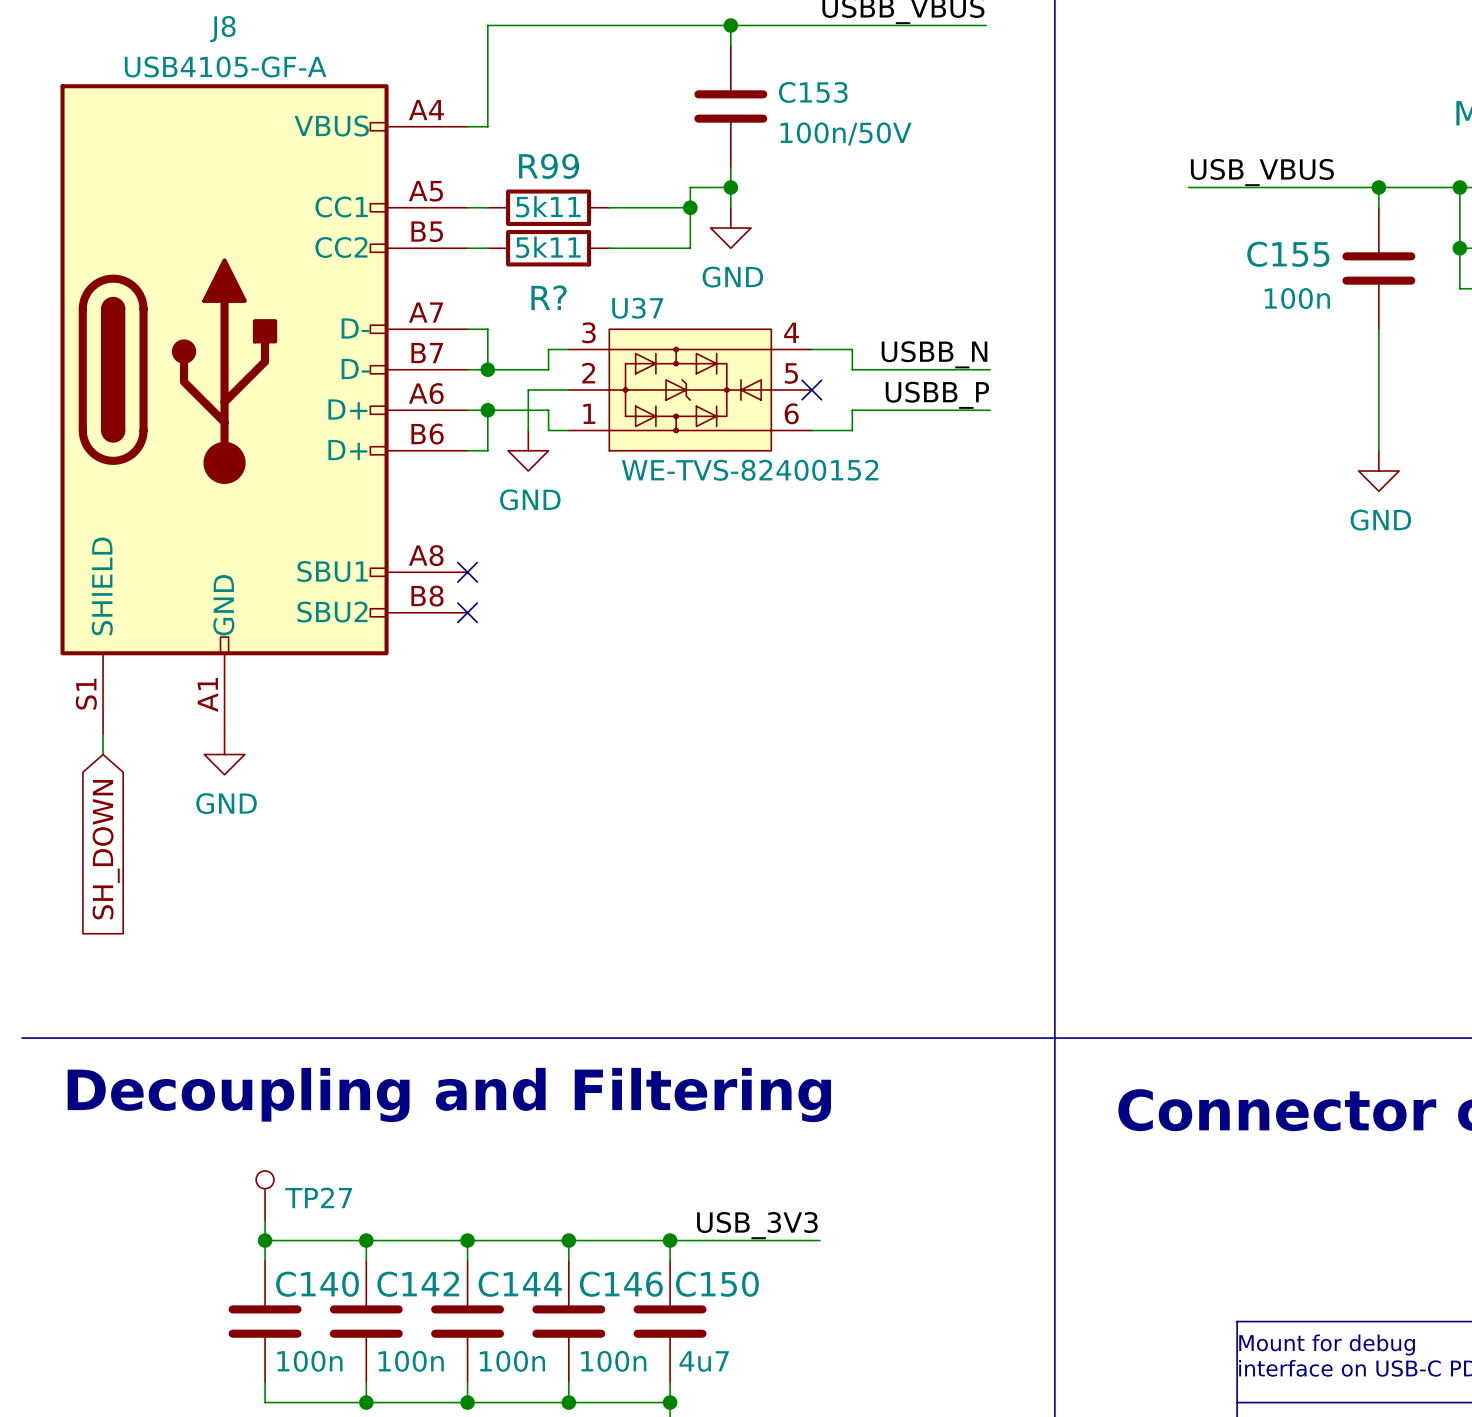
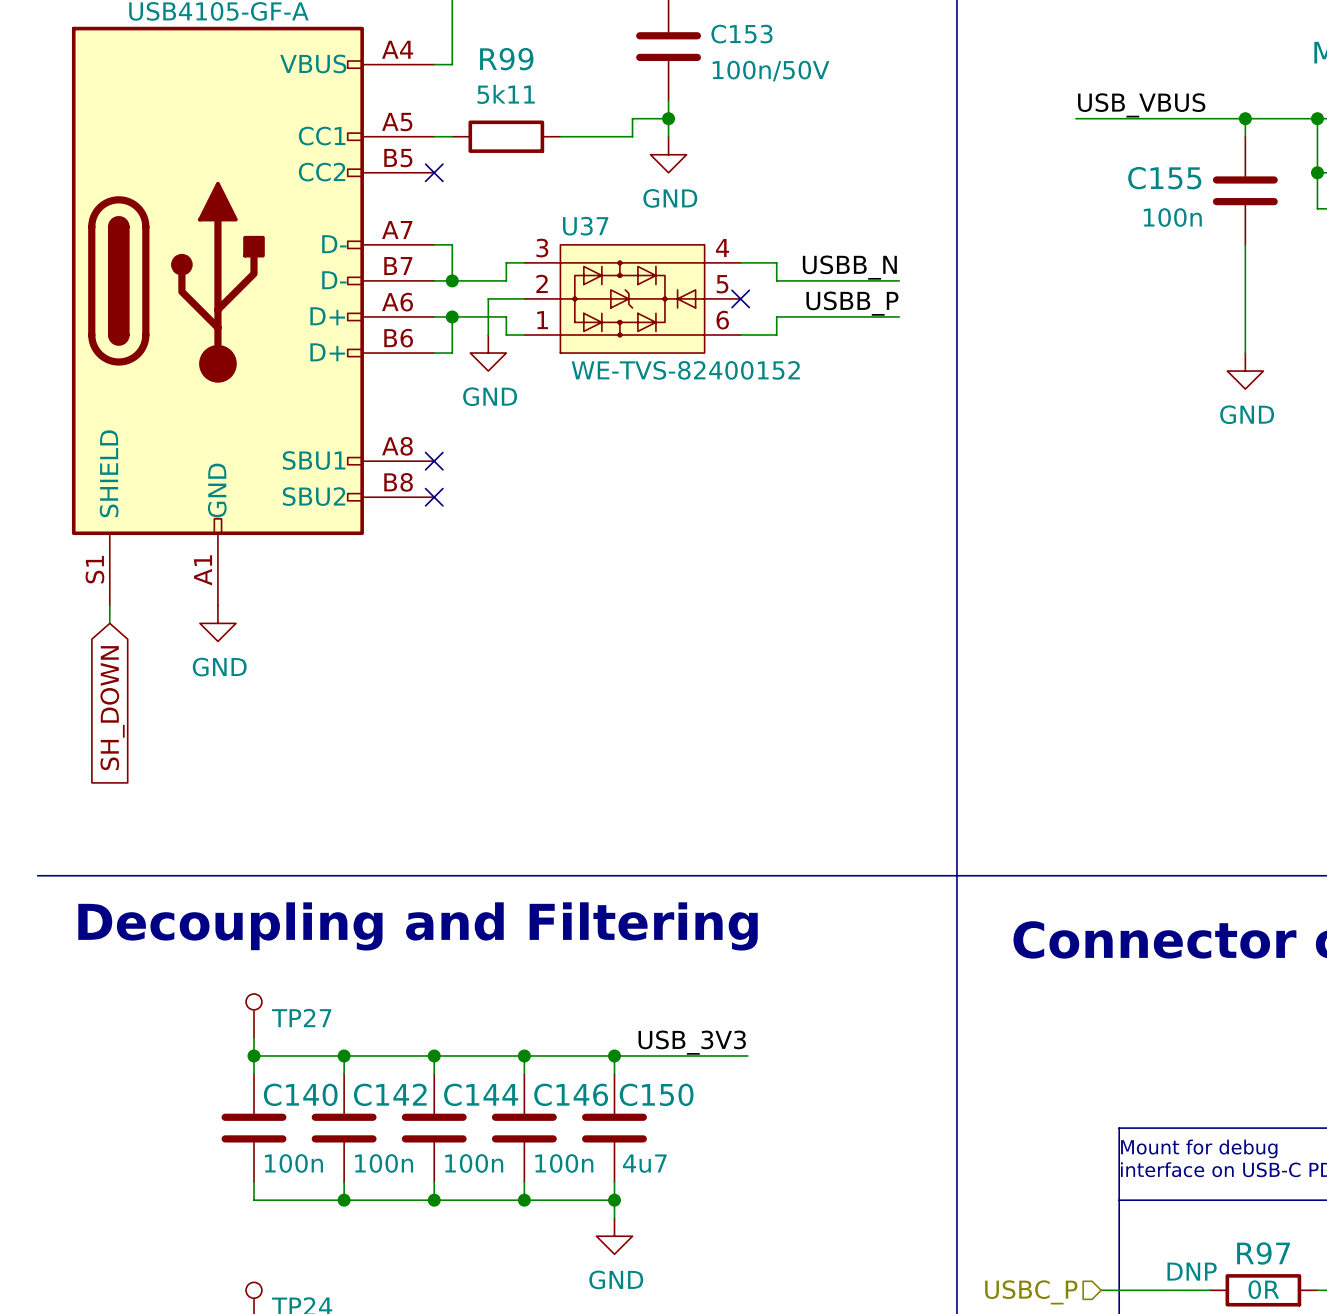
R99 name position: R99 (549, 166) -> R99 (506, 59)
R99 text position: 5k11 (548, 206) -> 5k11 (506, 94)
wire: (690, 207) (690, 248) (609, 248) -> none
junction: (690, 207) -> none
wire: (467, 248) (487, 248) -> none
no-connect mark: none -> (434, 172)
R?: (548, 248) -> none

